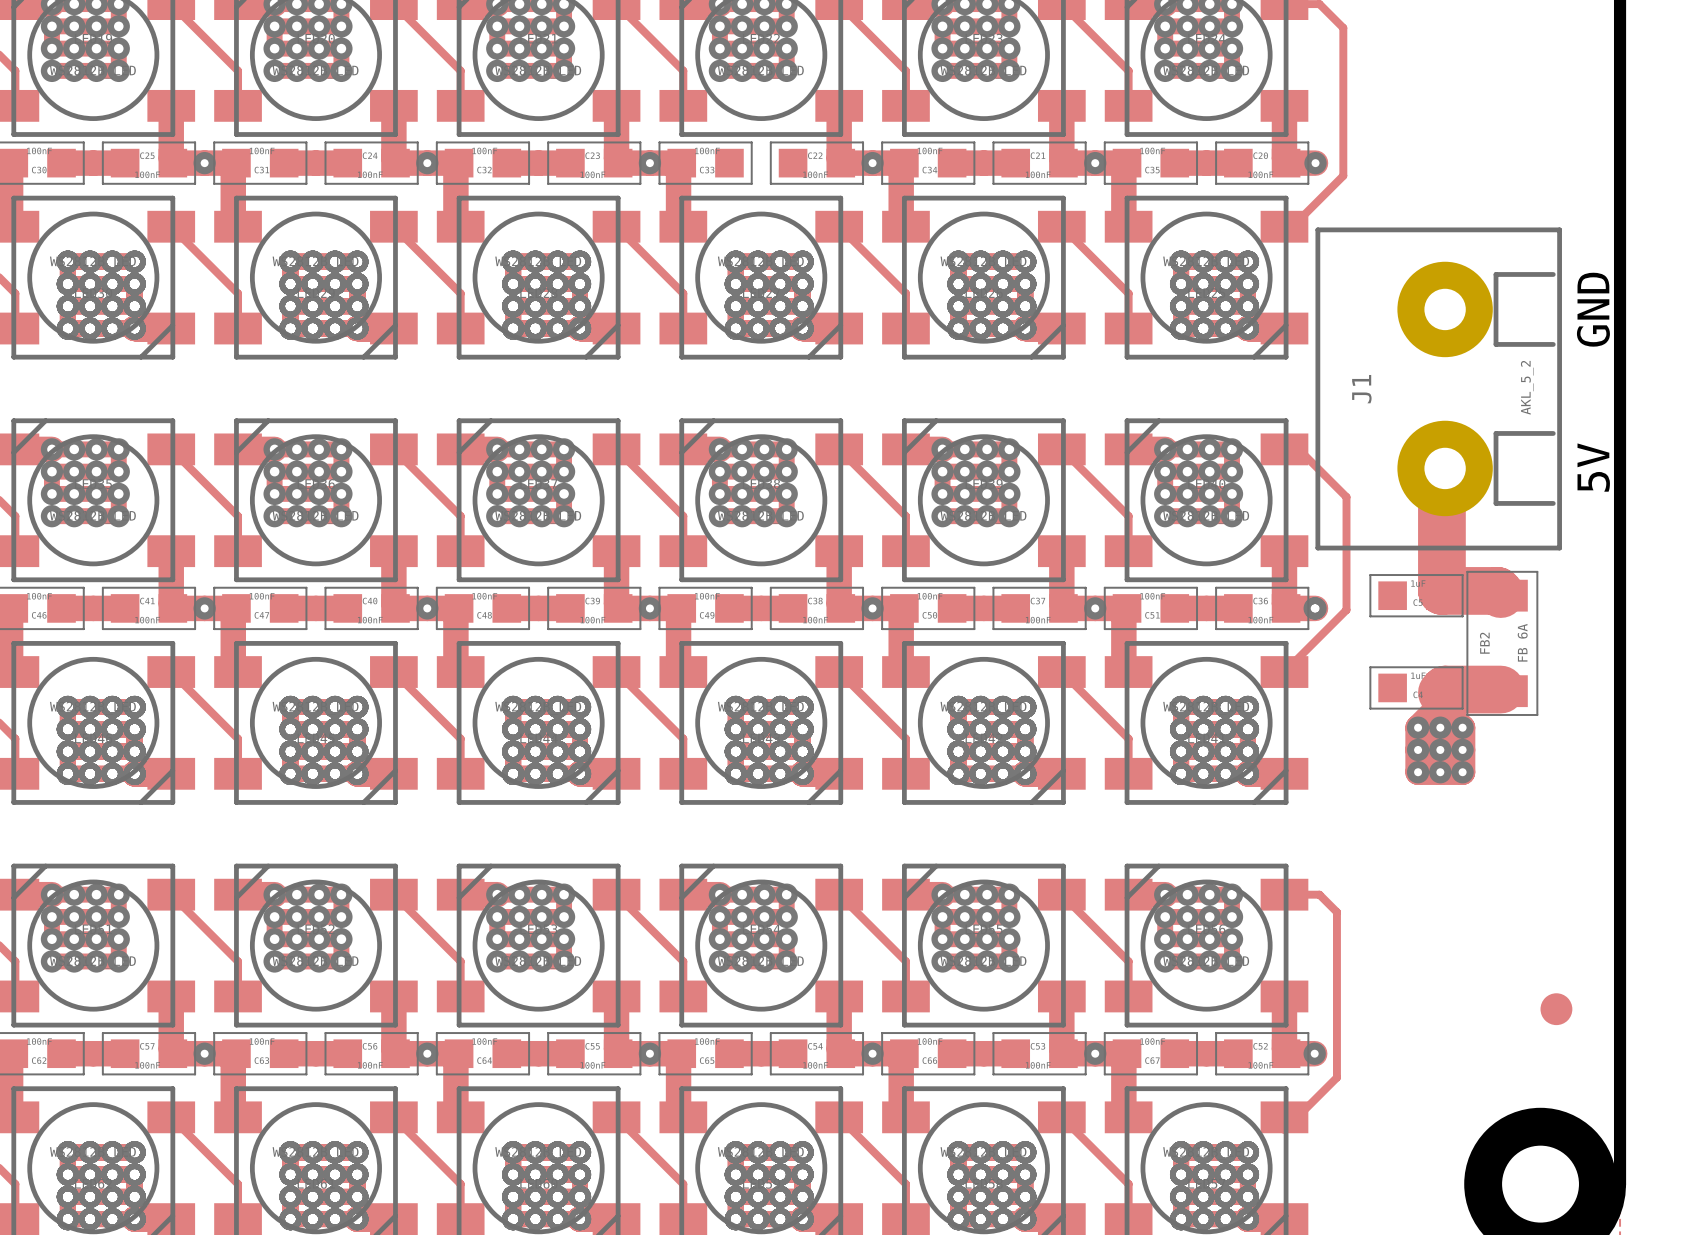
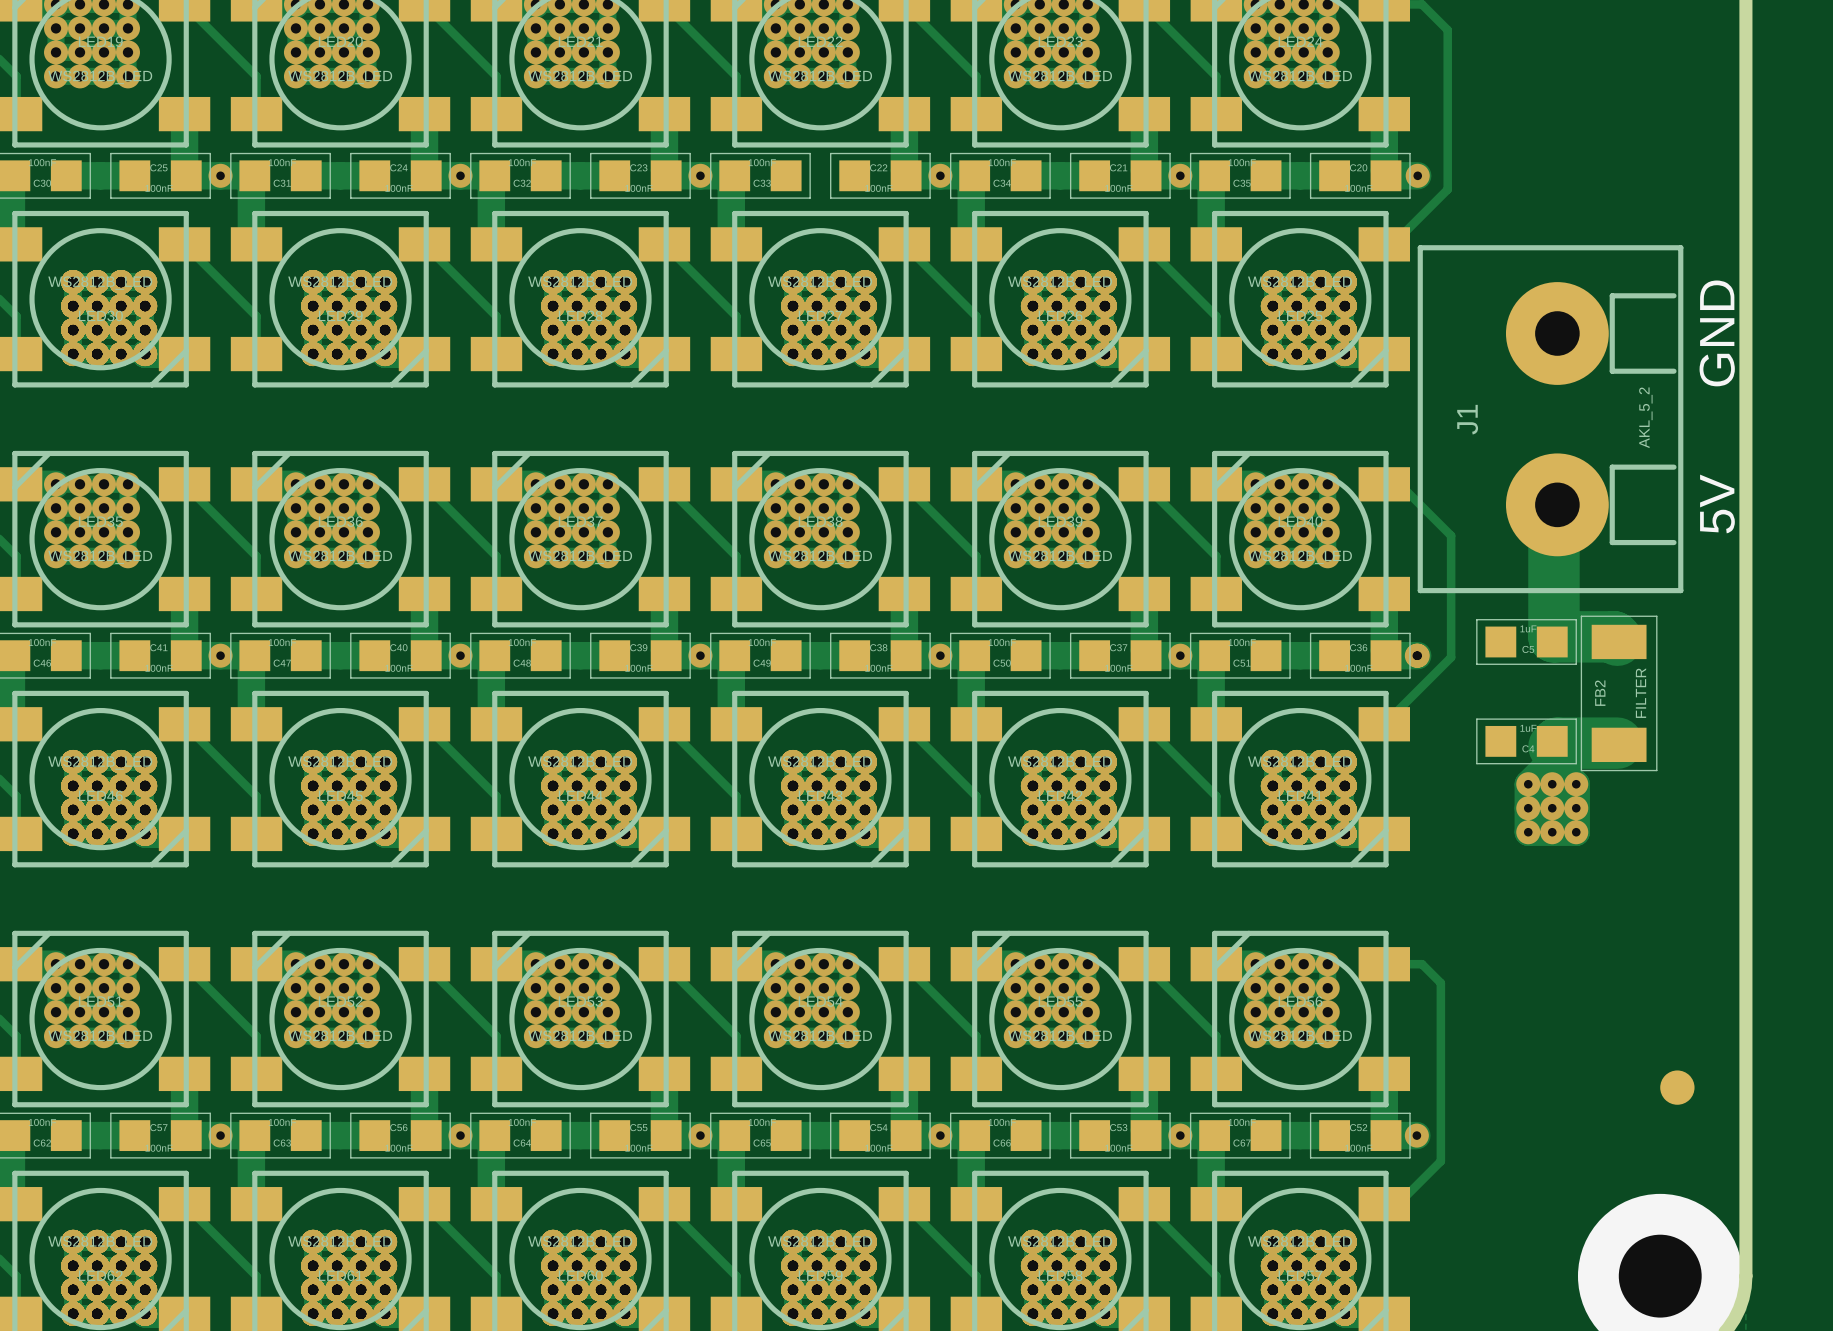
FB2 value: FB 6A (1522, 642) -> FILTER (1641, 693)

